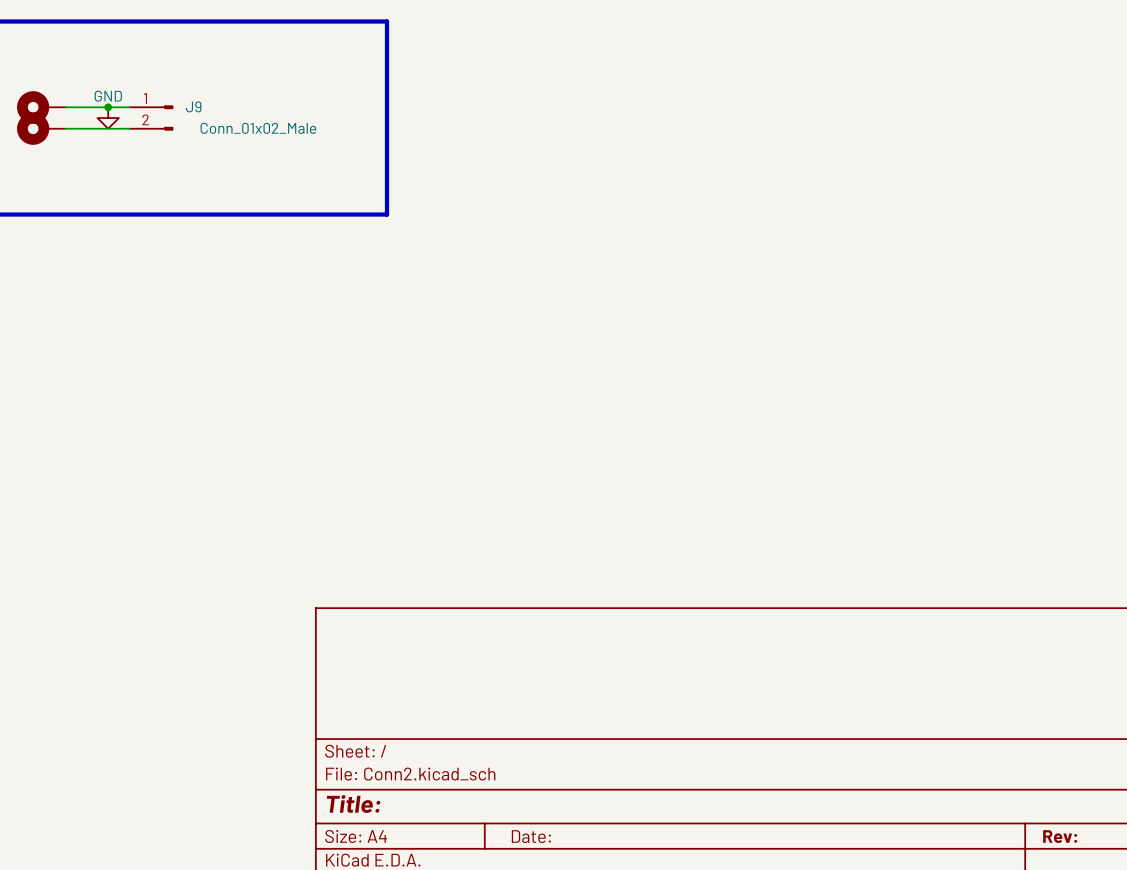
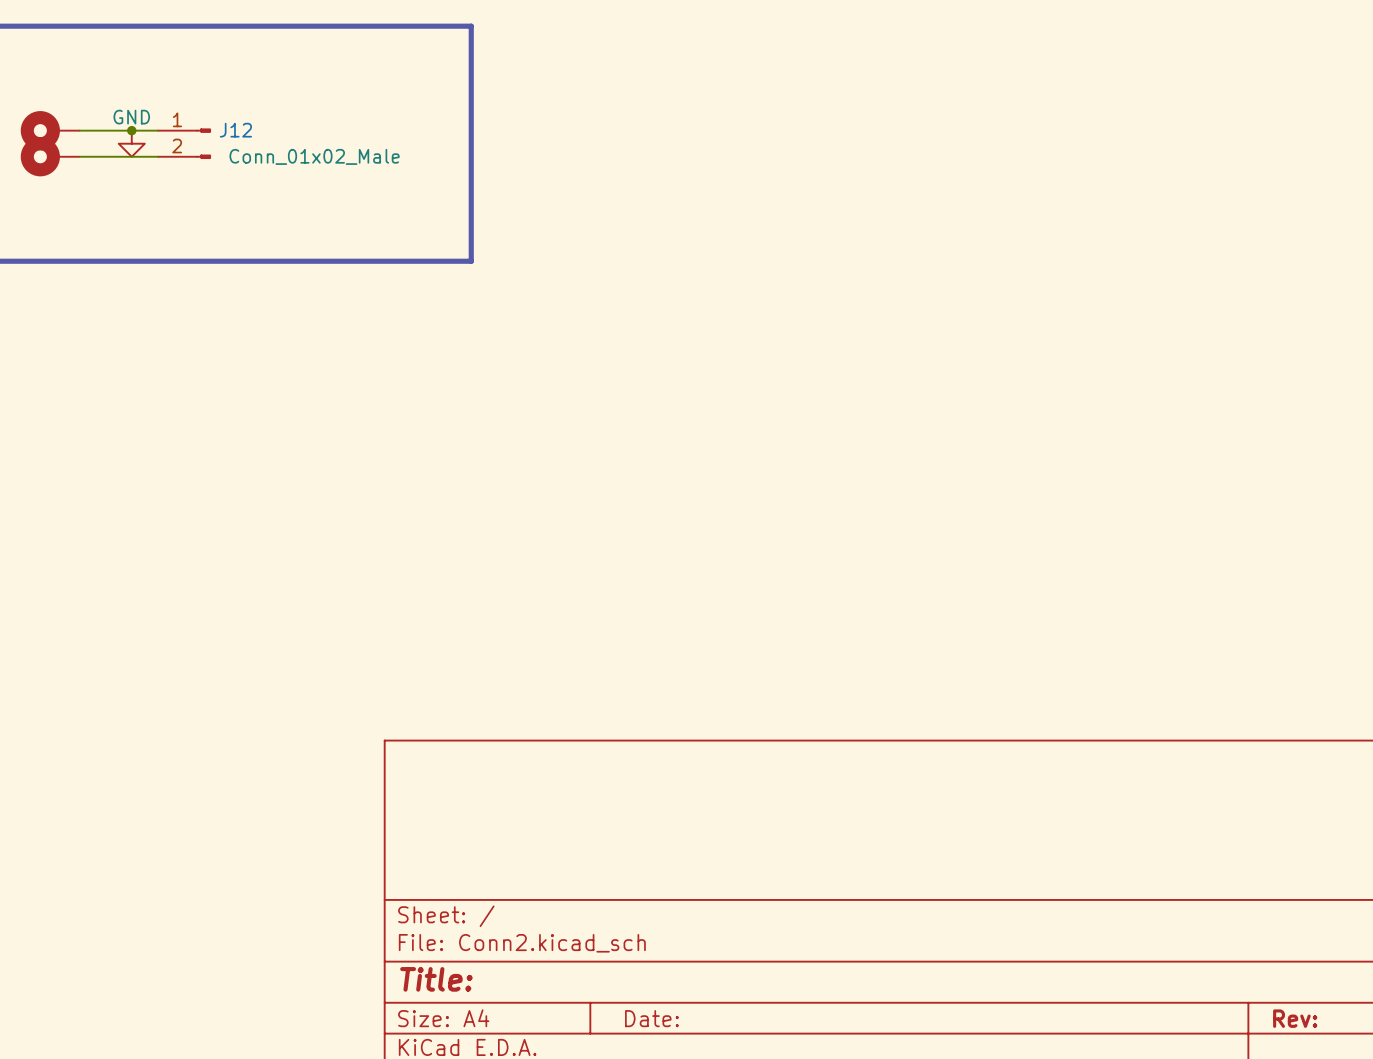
J9 name: J9 (193, 106) -> J12 (235, 130)

